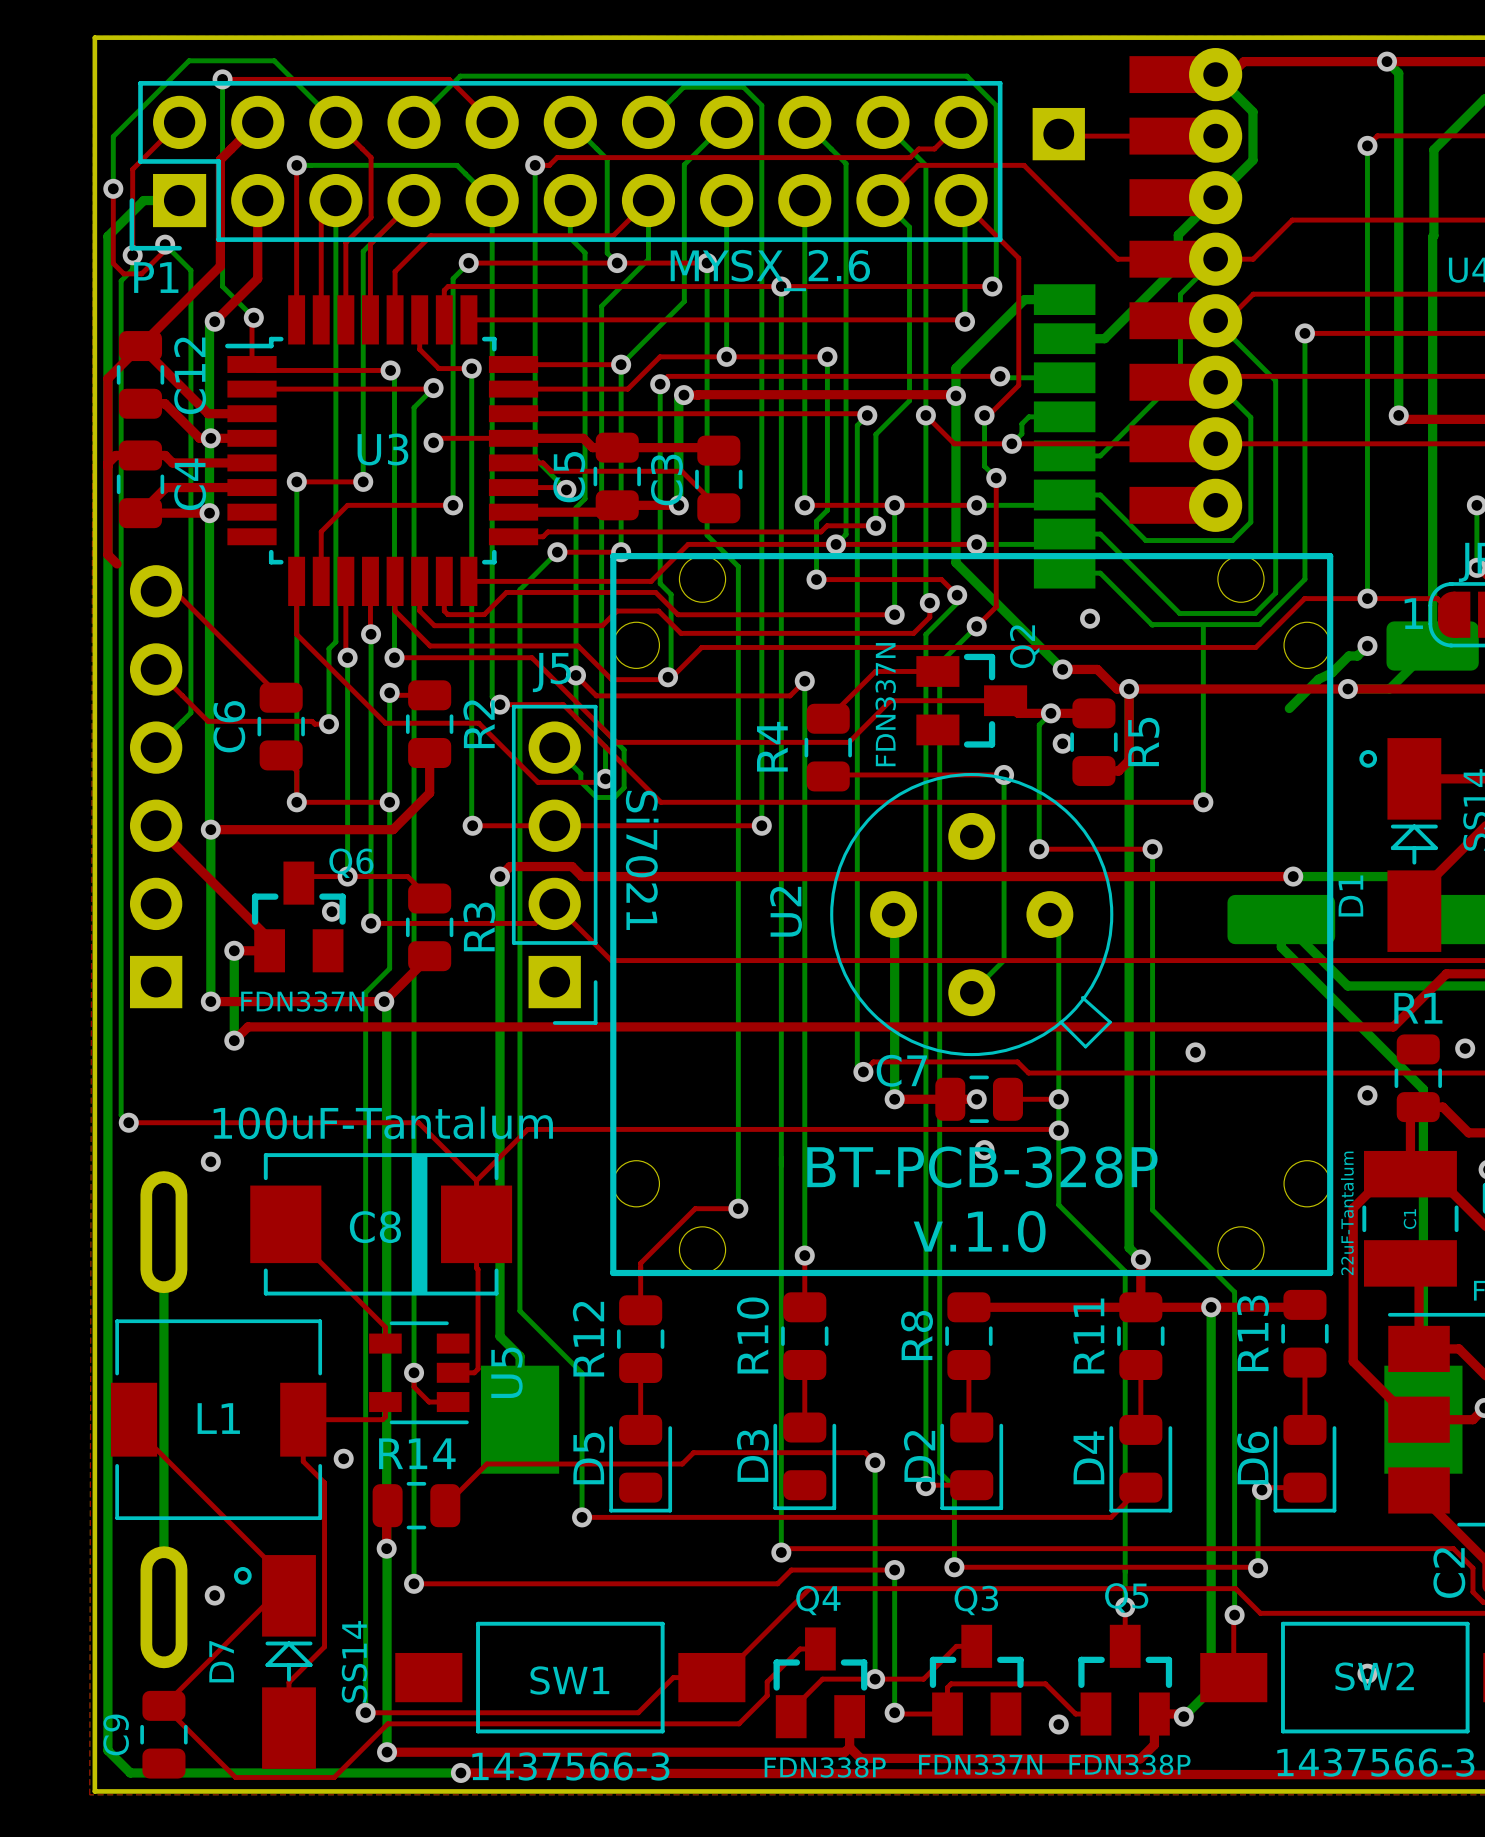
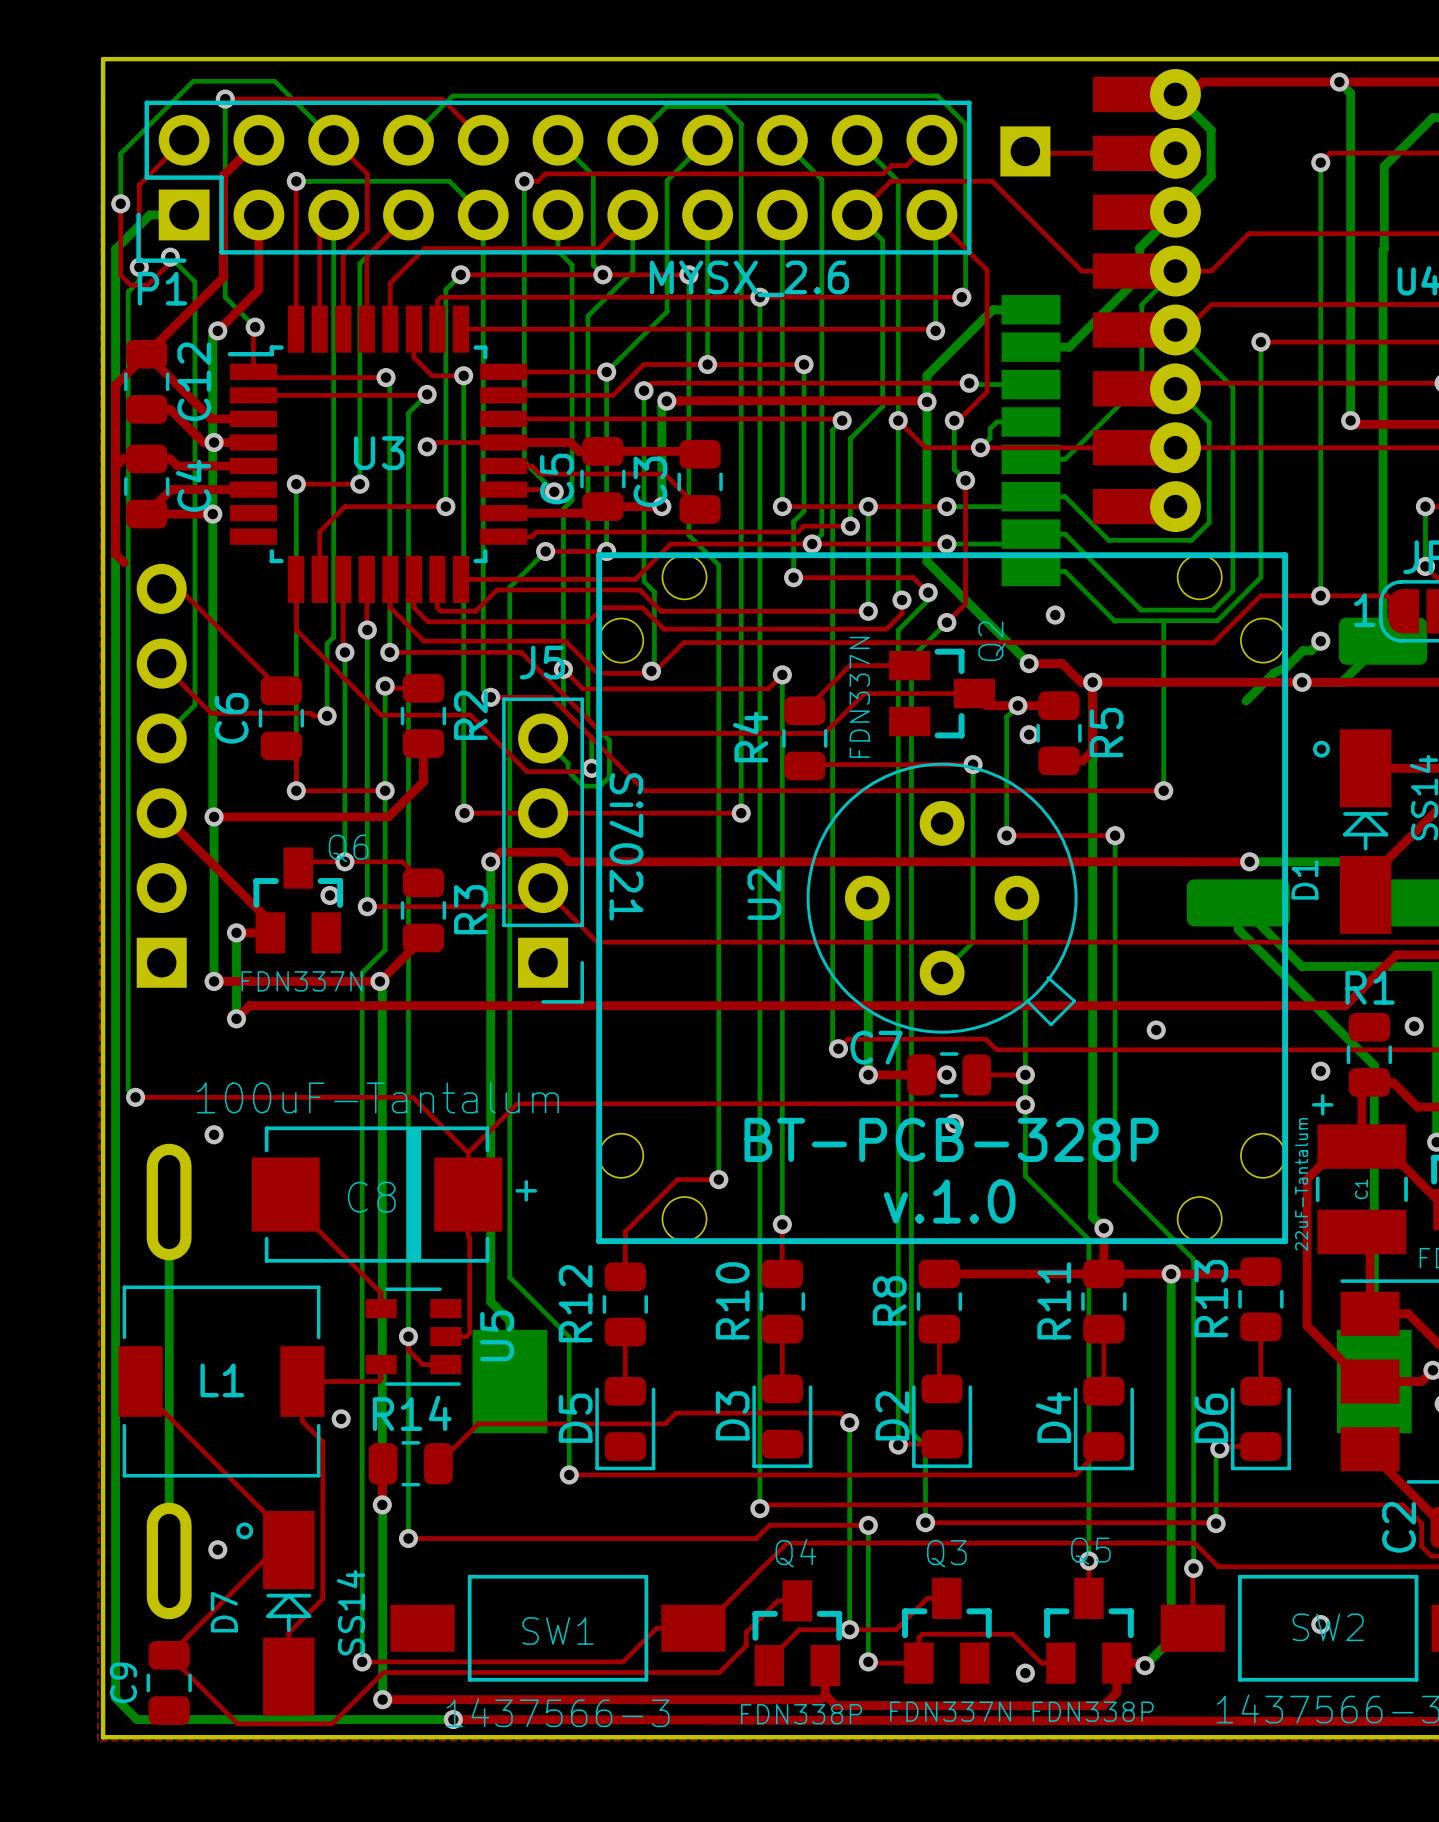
text: none -> + (1322, 1104)
text: none -> + (526, 1190)

